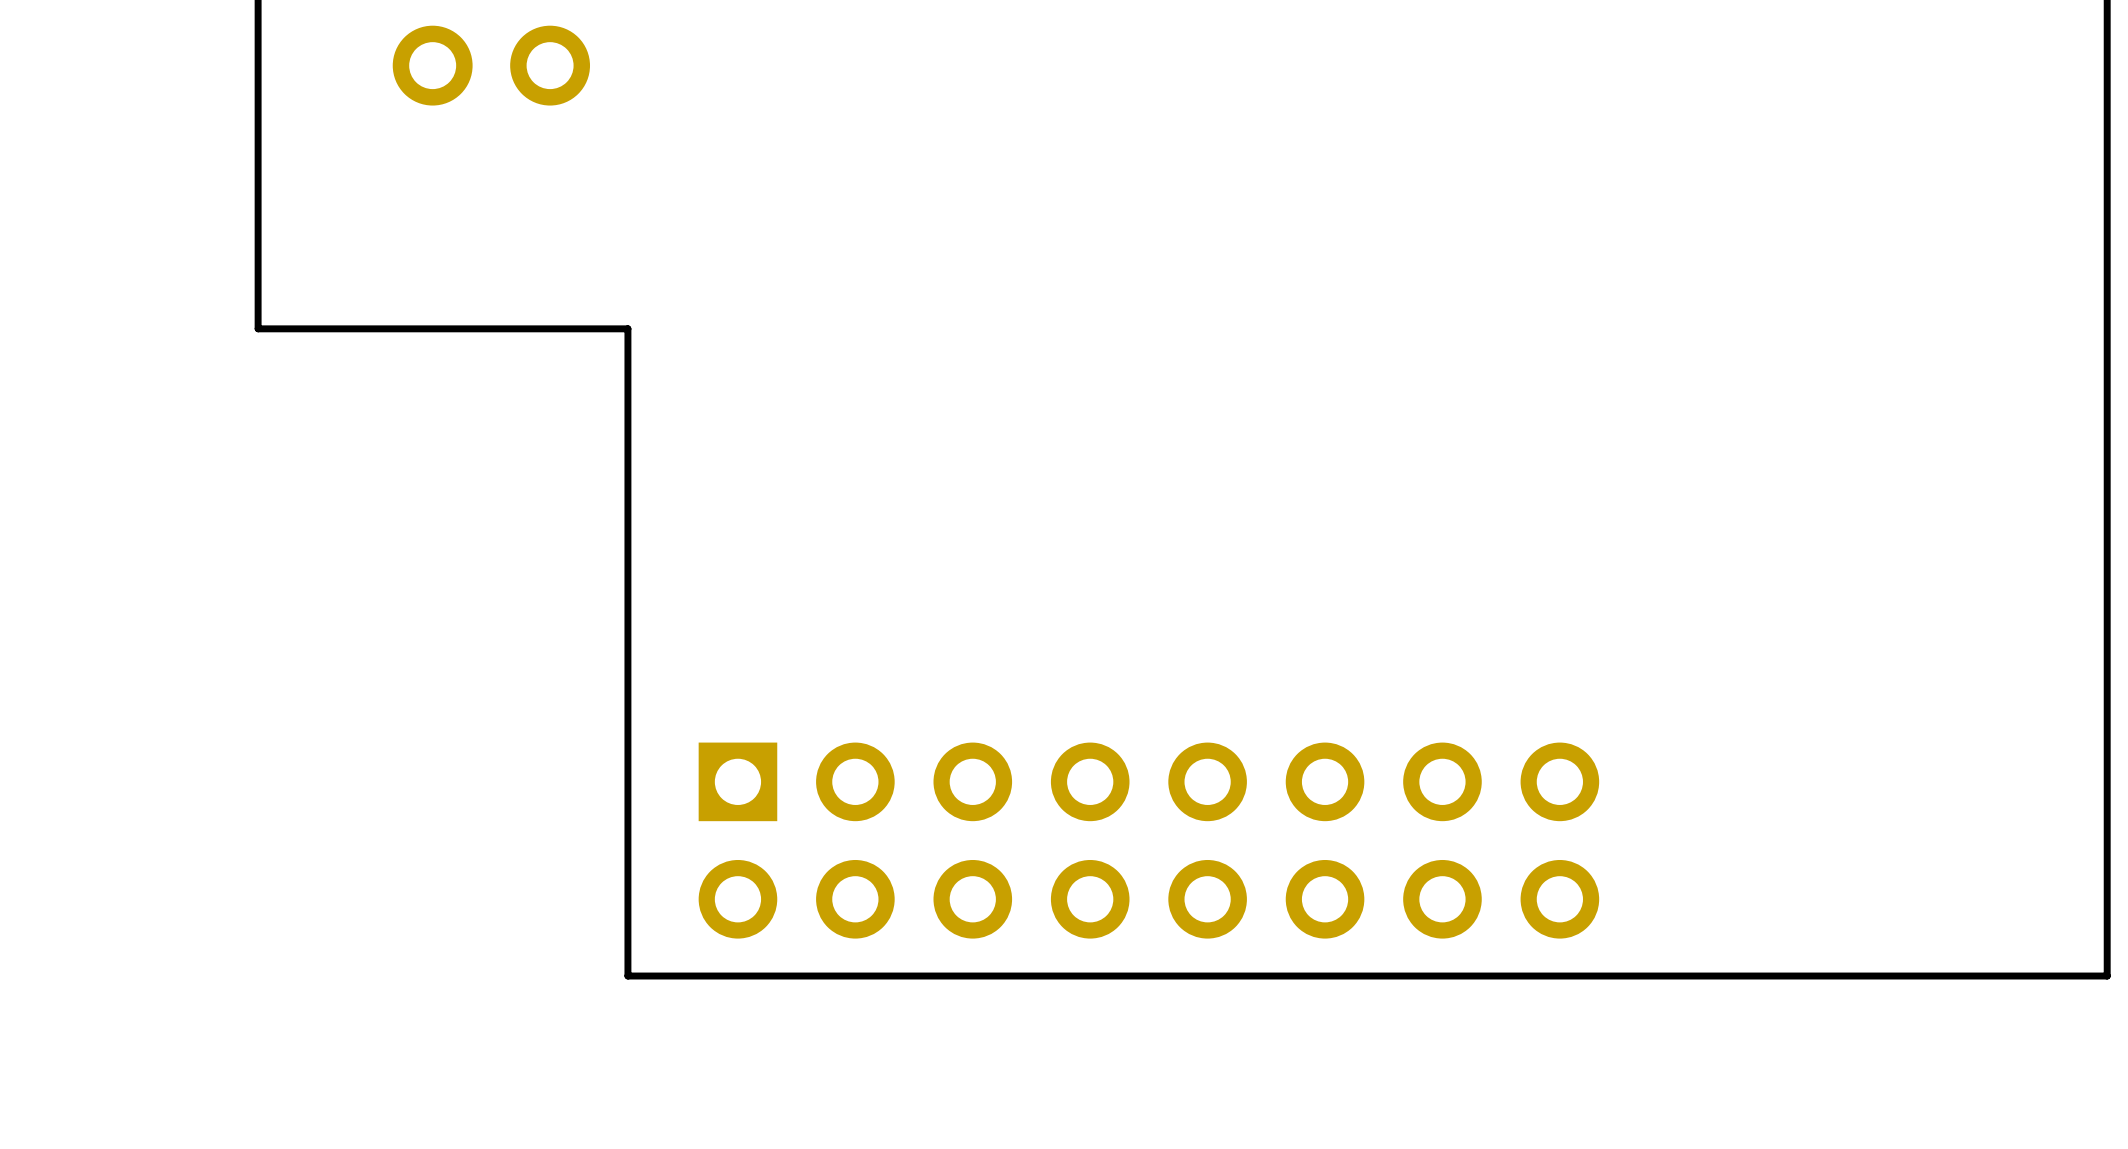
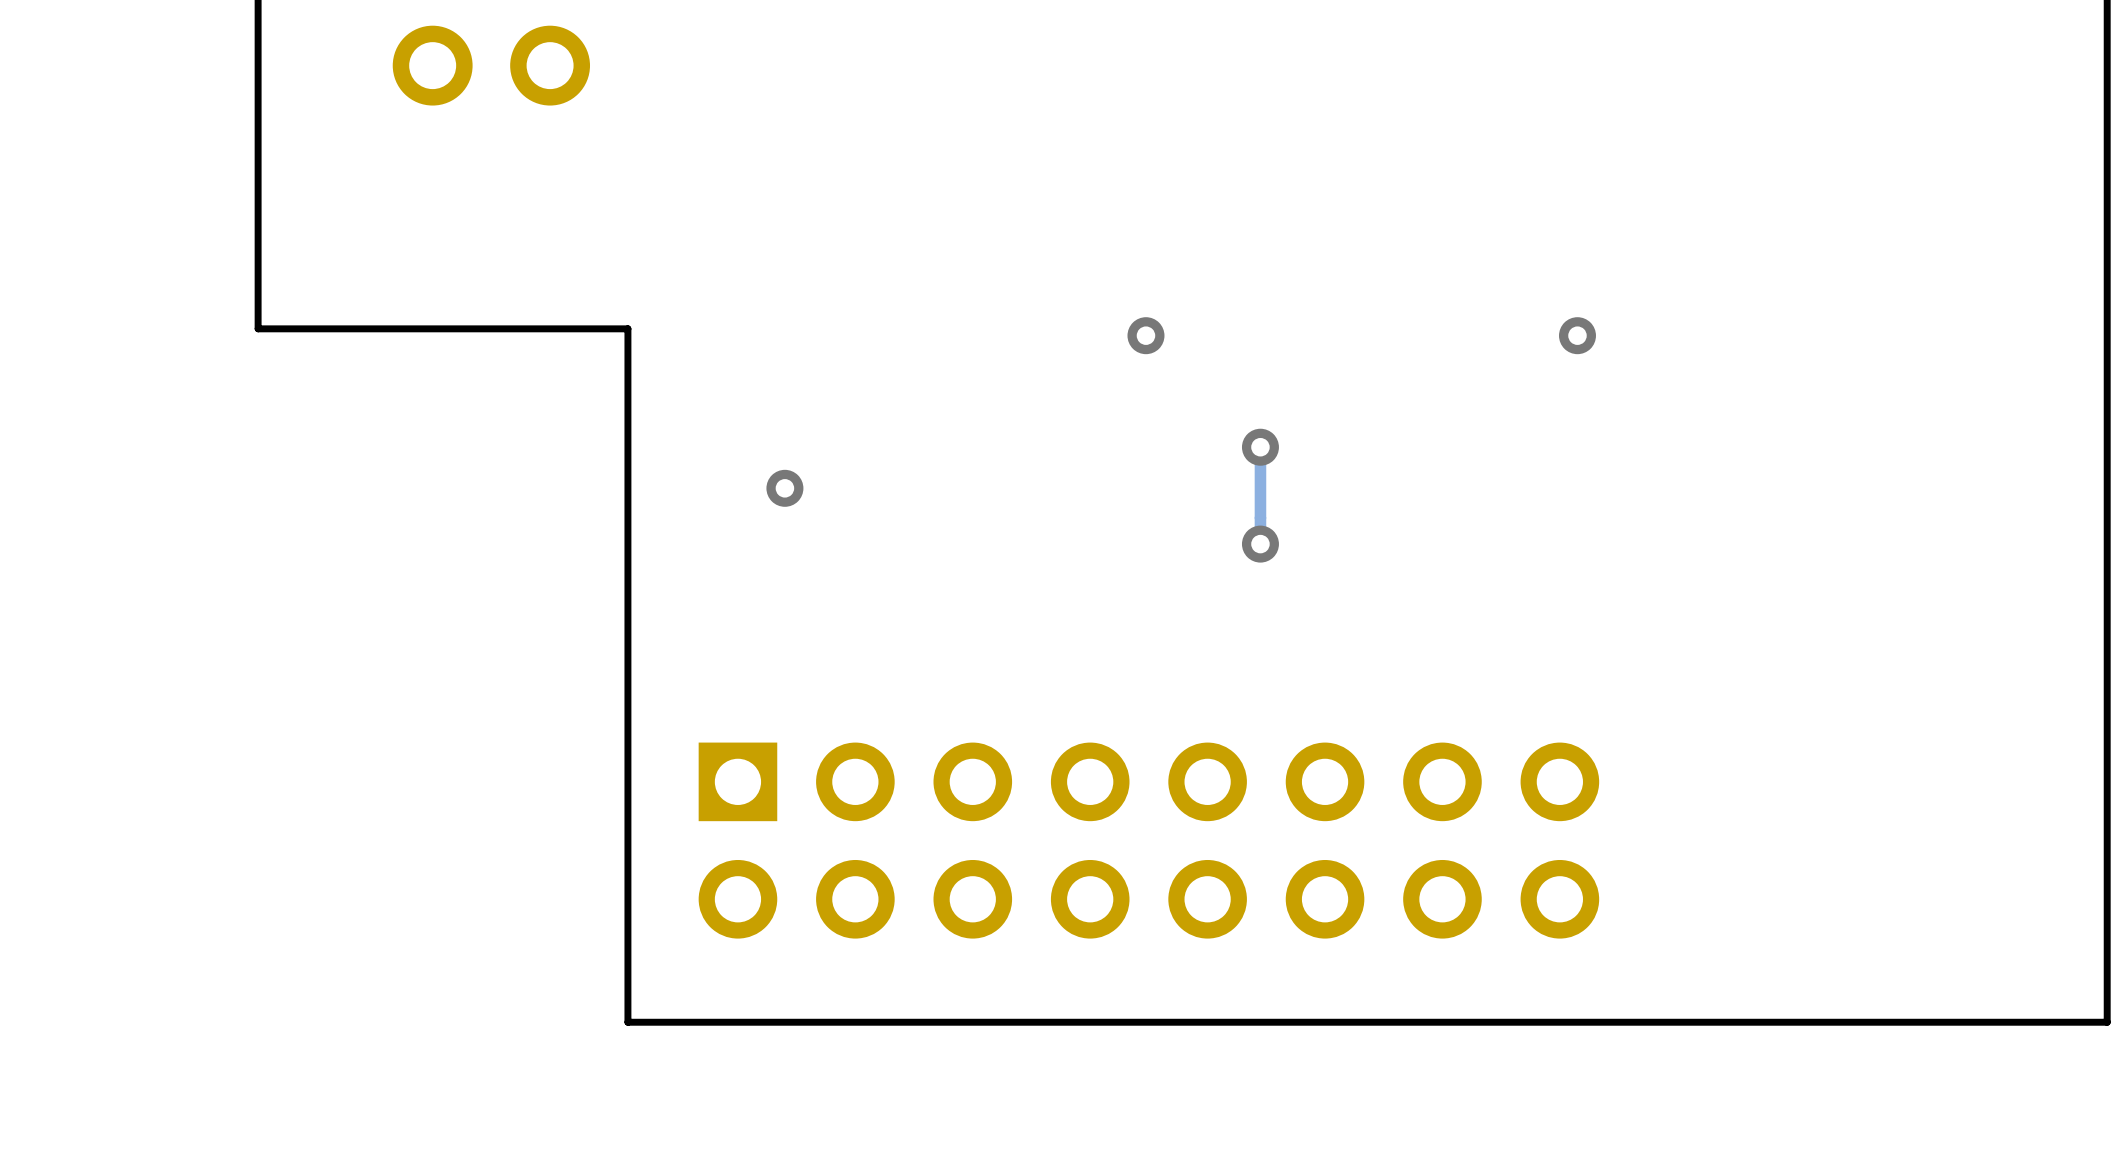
via: none -> (1145, 335)
via: none -> (1577, 335)
track: none -> (1260, 447) (1260, 544)
via: none -> (1260, 447)
via: none -> (784, 488)
via: none -> (1260, 544)
board edge: (2107, 976) (627, 976) -> (2107, 976) (2107, 1022) (627, 1022) (627, 976)

